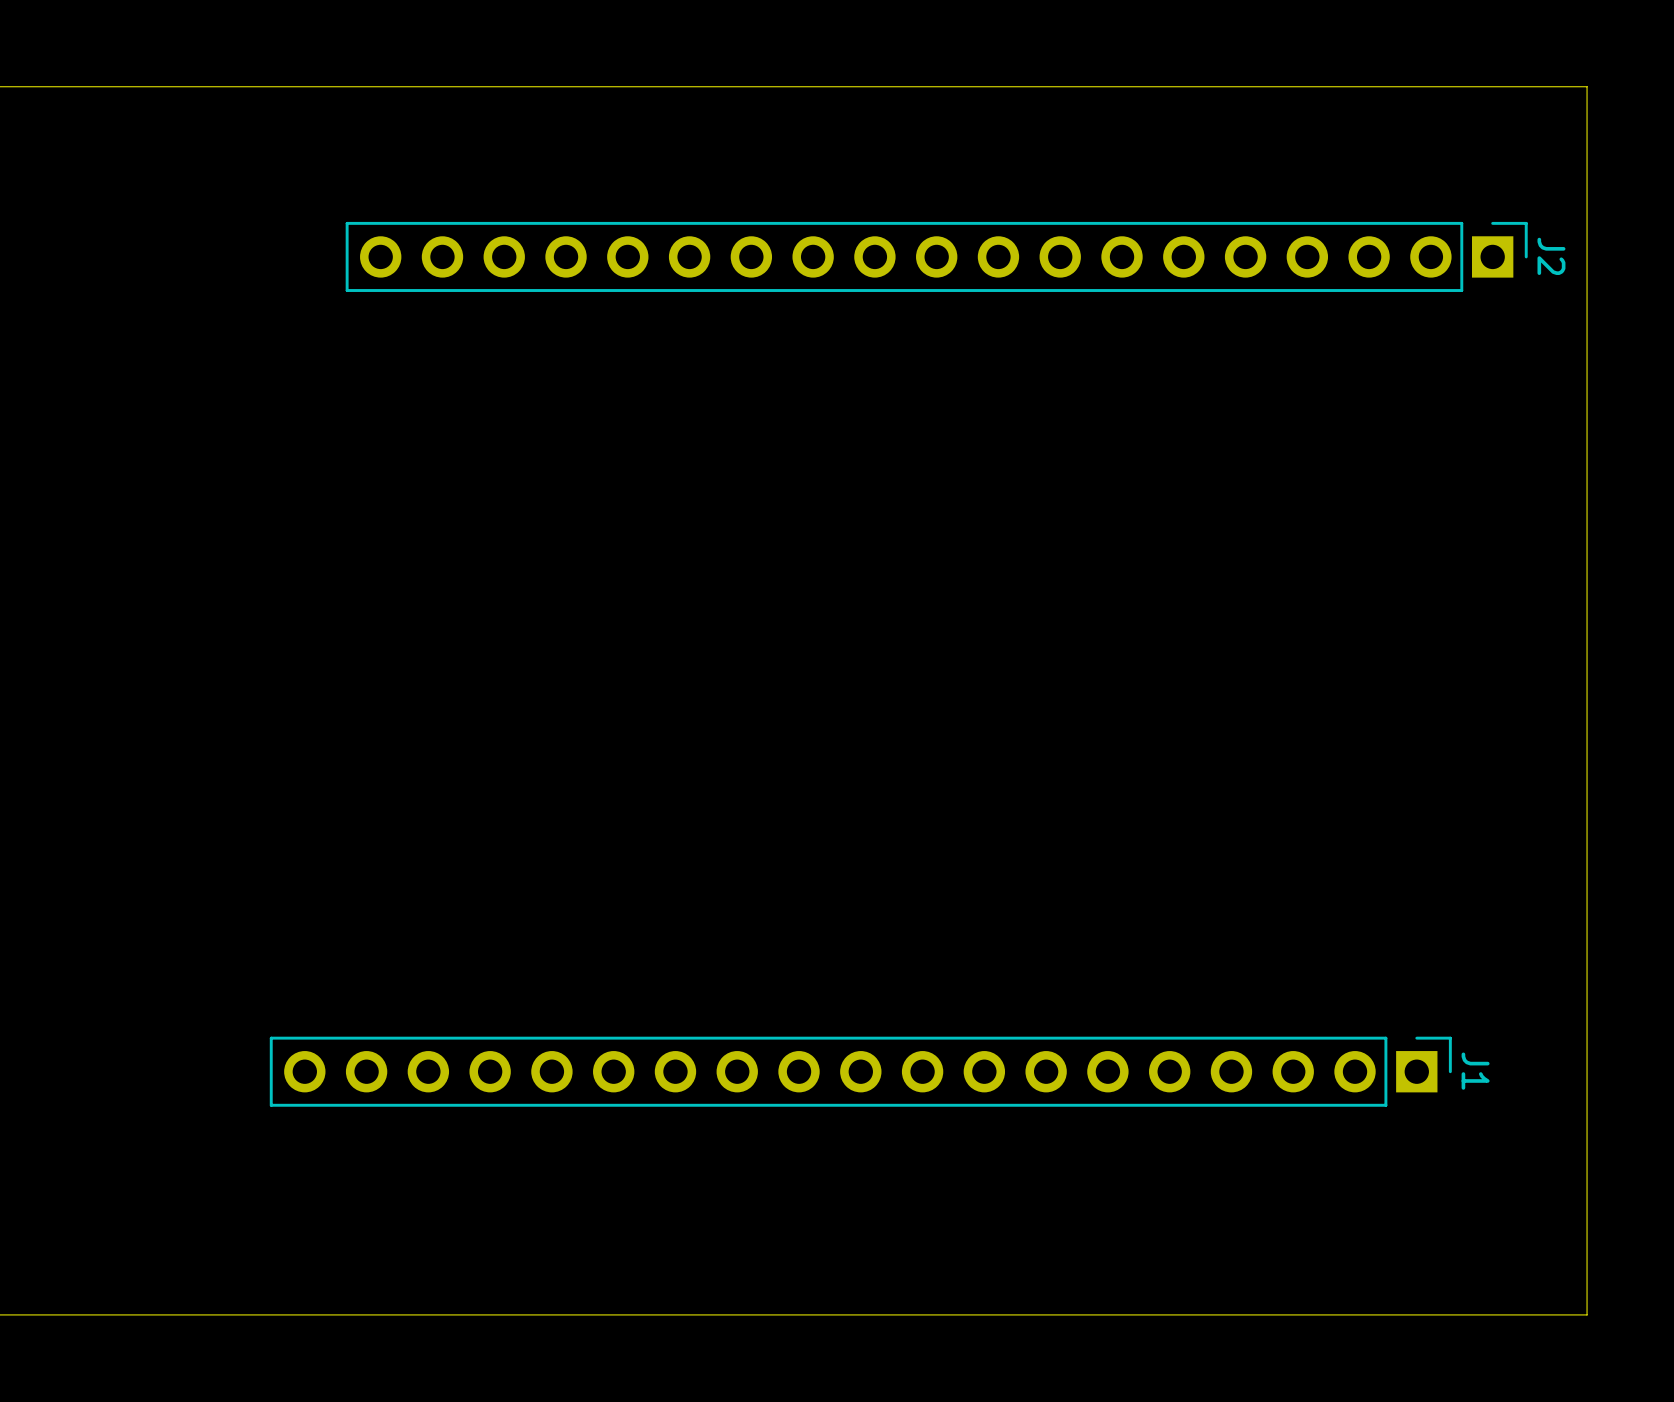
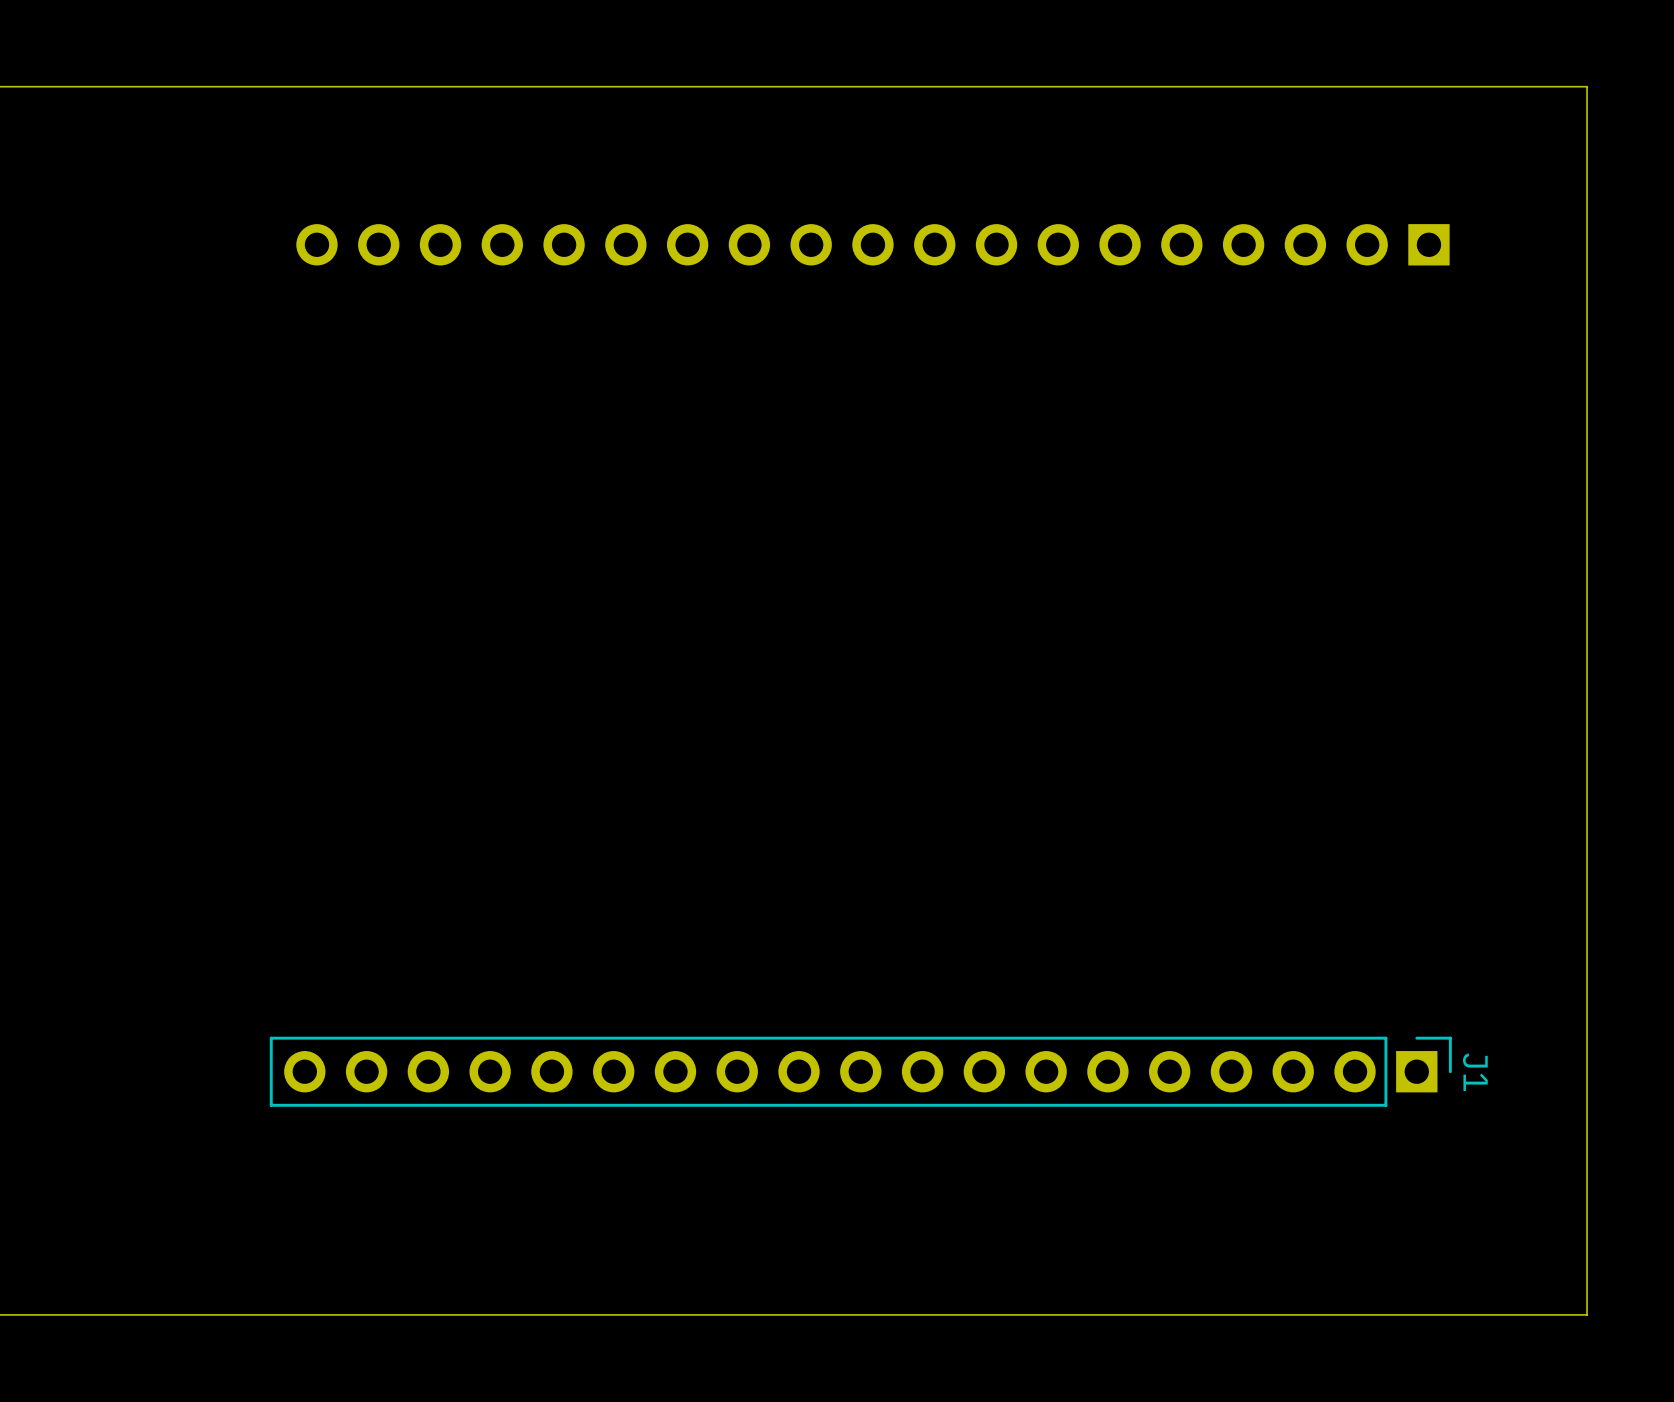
J2 side: bottom (936, 256) -> top (872, 244)

